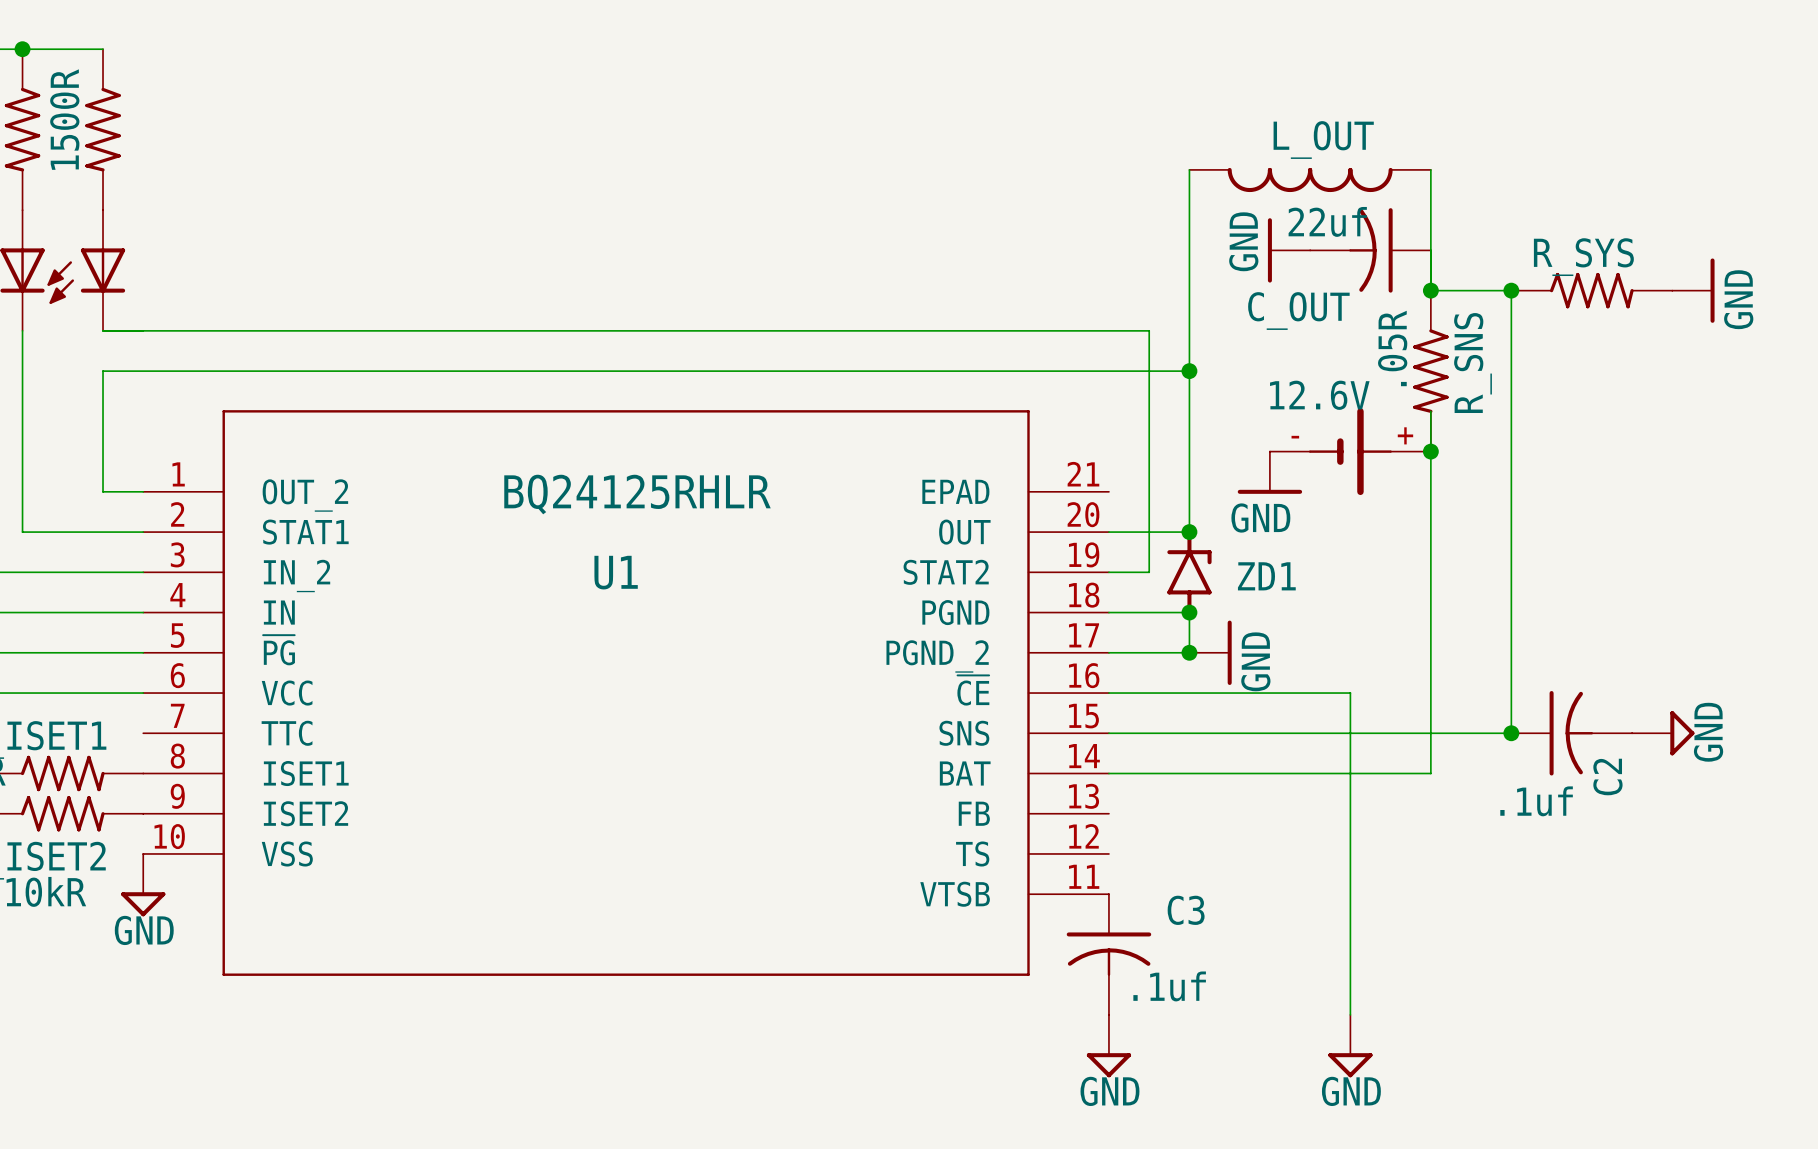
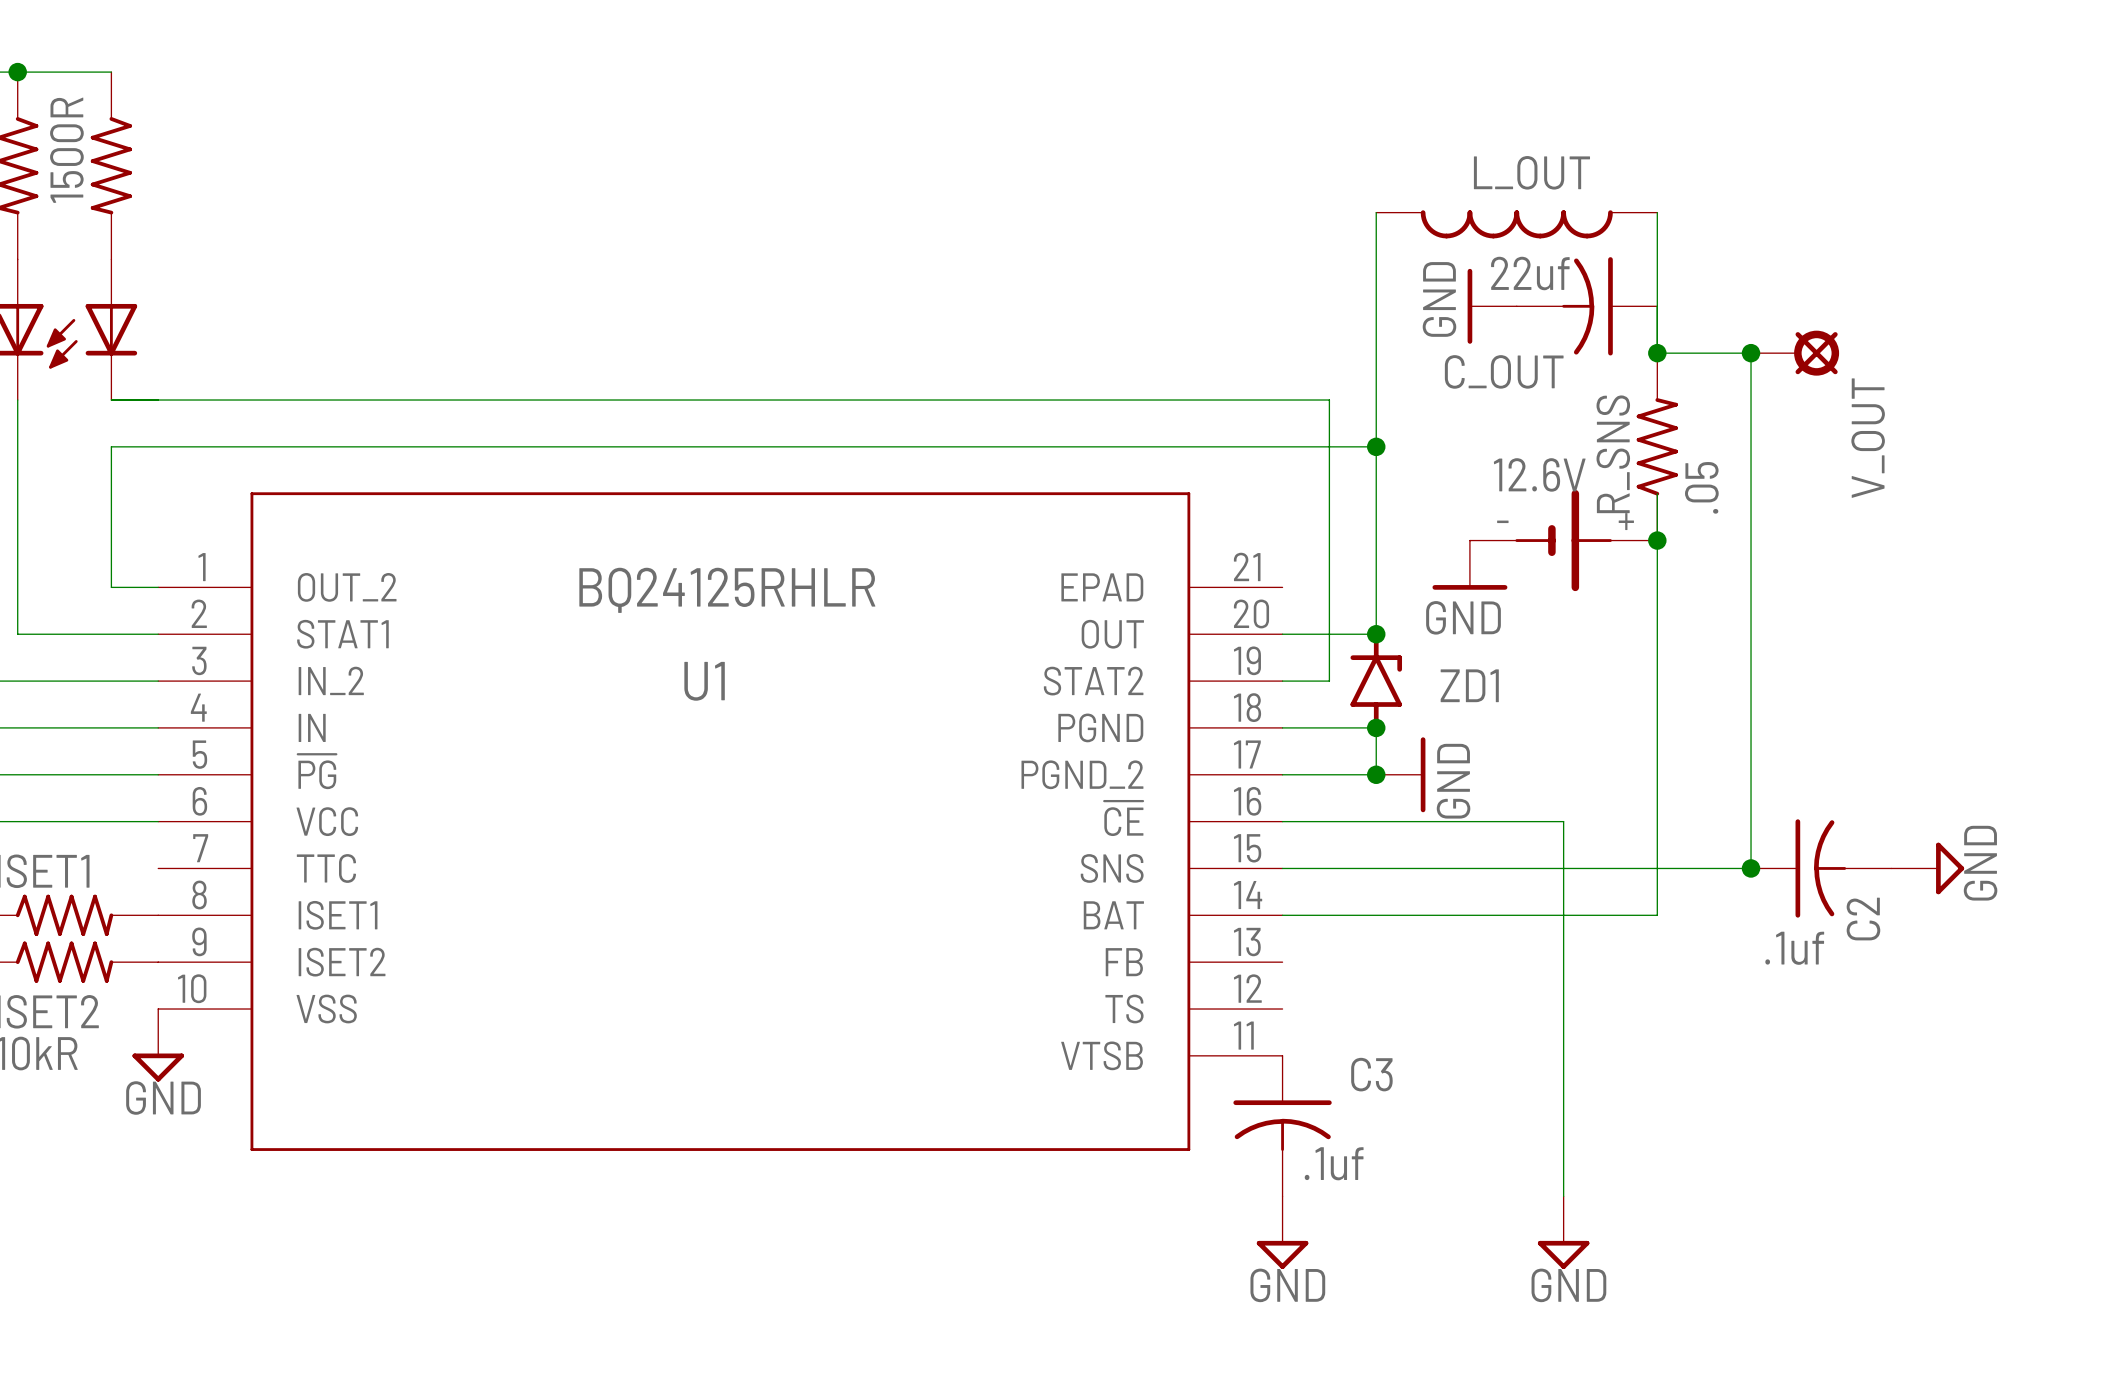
V_OUT: none -> (1795, 353)
R_SYS: (1591, 290) -> none
power symbol: GND (1693, 290) -> none
R_SNS value: .05R (1392, 348) -> .05 (1701, 487)
R_SNS rotation: 0° (1430, 371) -> 180° (1657, 446)

